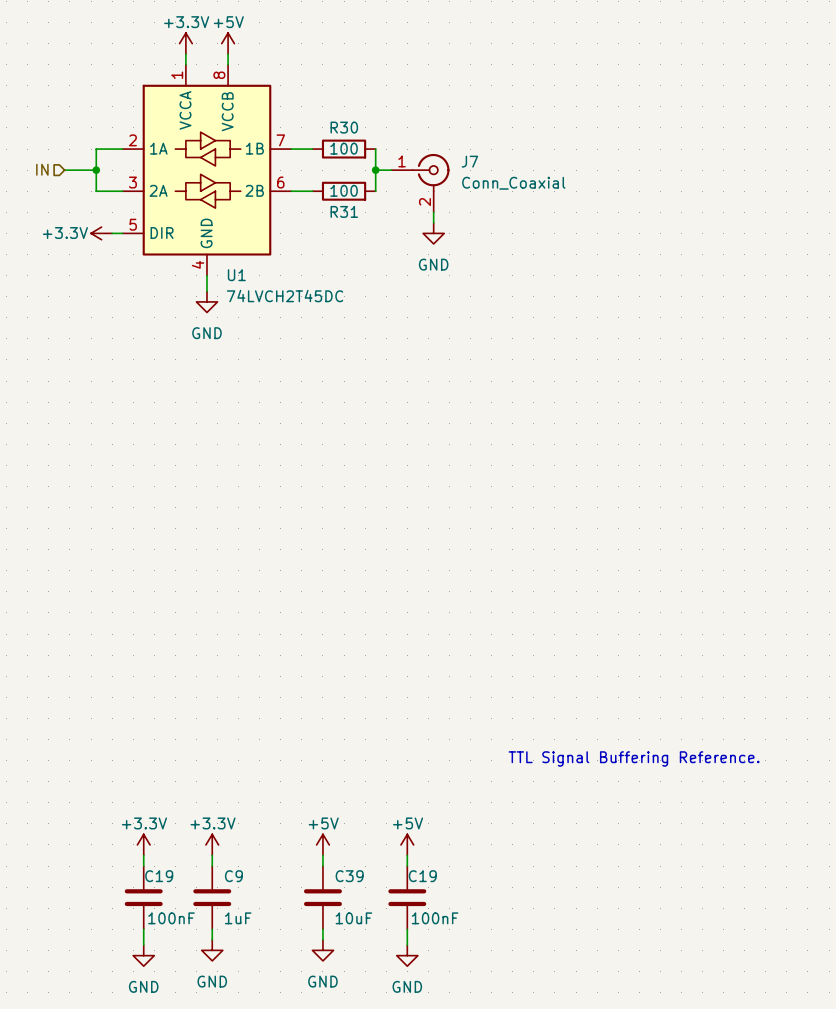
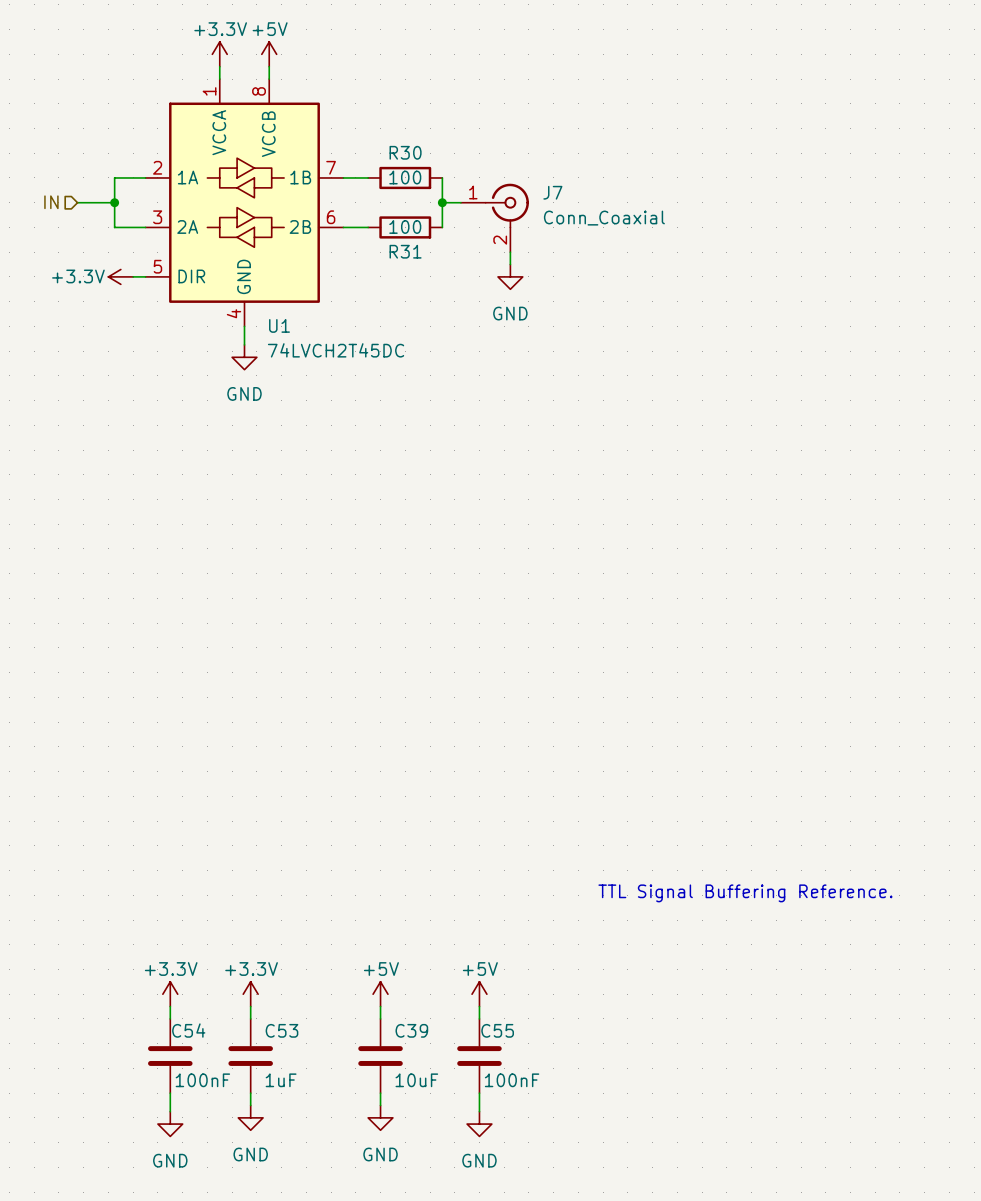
C19 name: C19 (159, 876) -> C54 (188, 1030)
C9 name: C9 (233, 876) -> C53 (281, 1030)
C19 name: C19 (422, 876) -> C55 (497, 1030)

